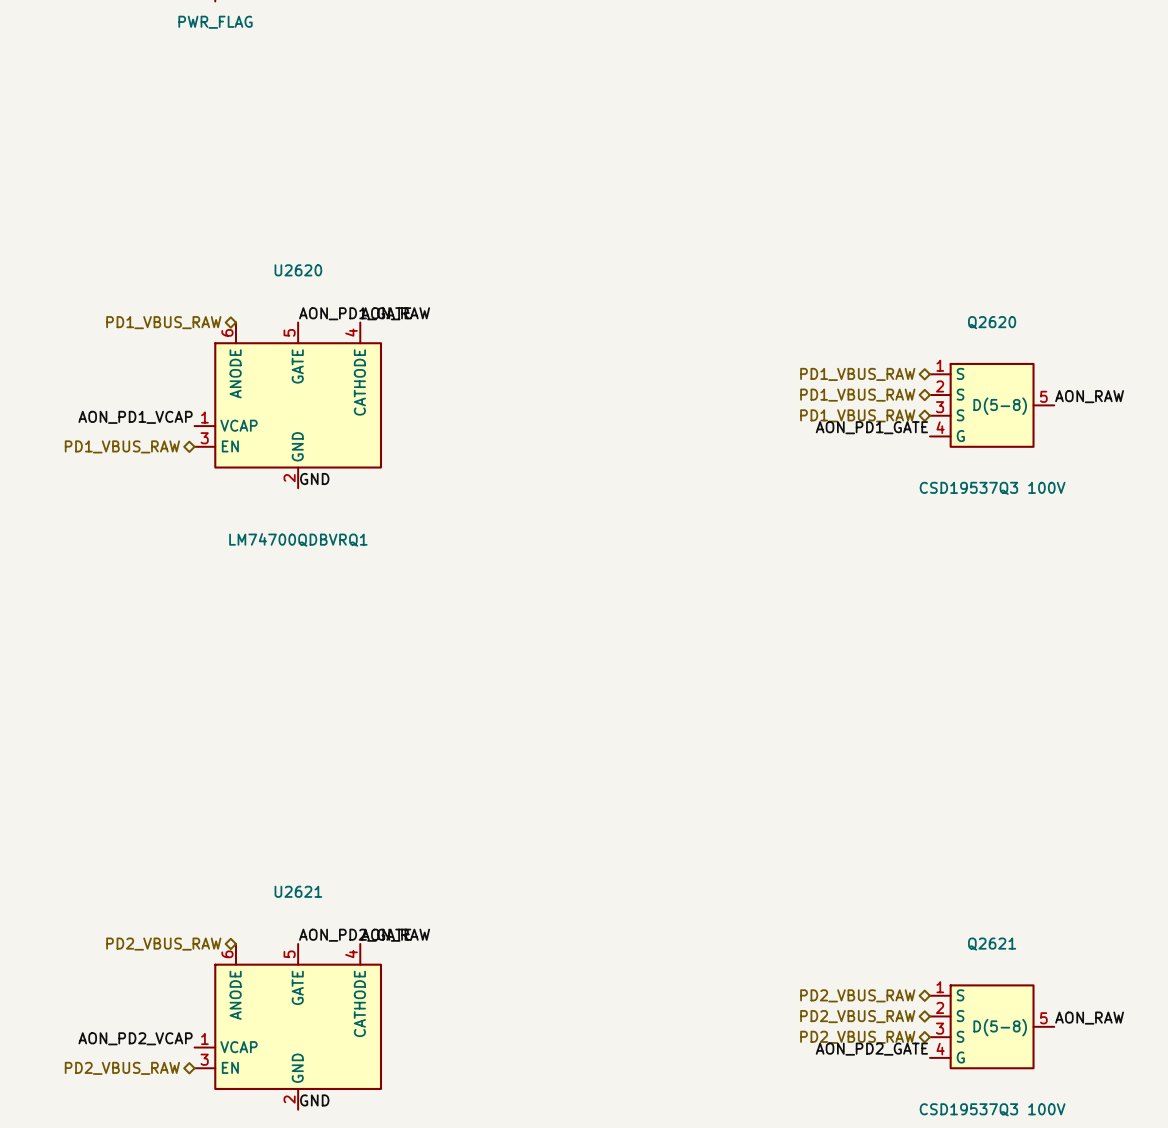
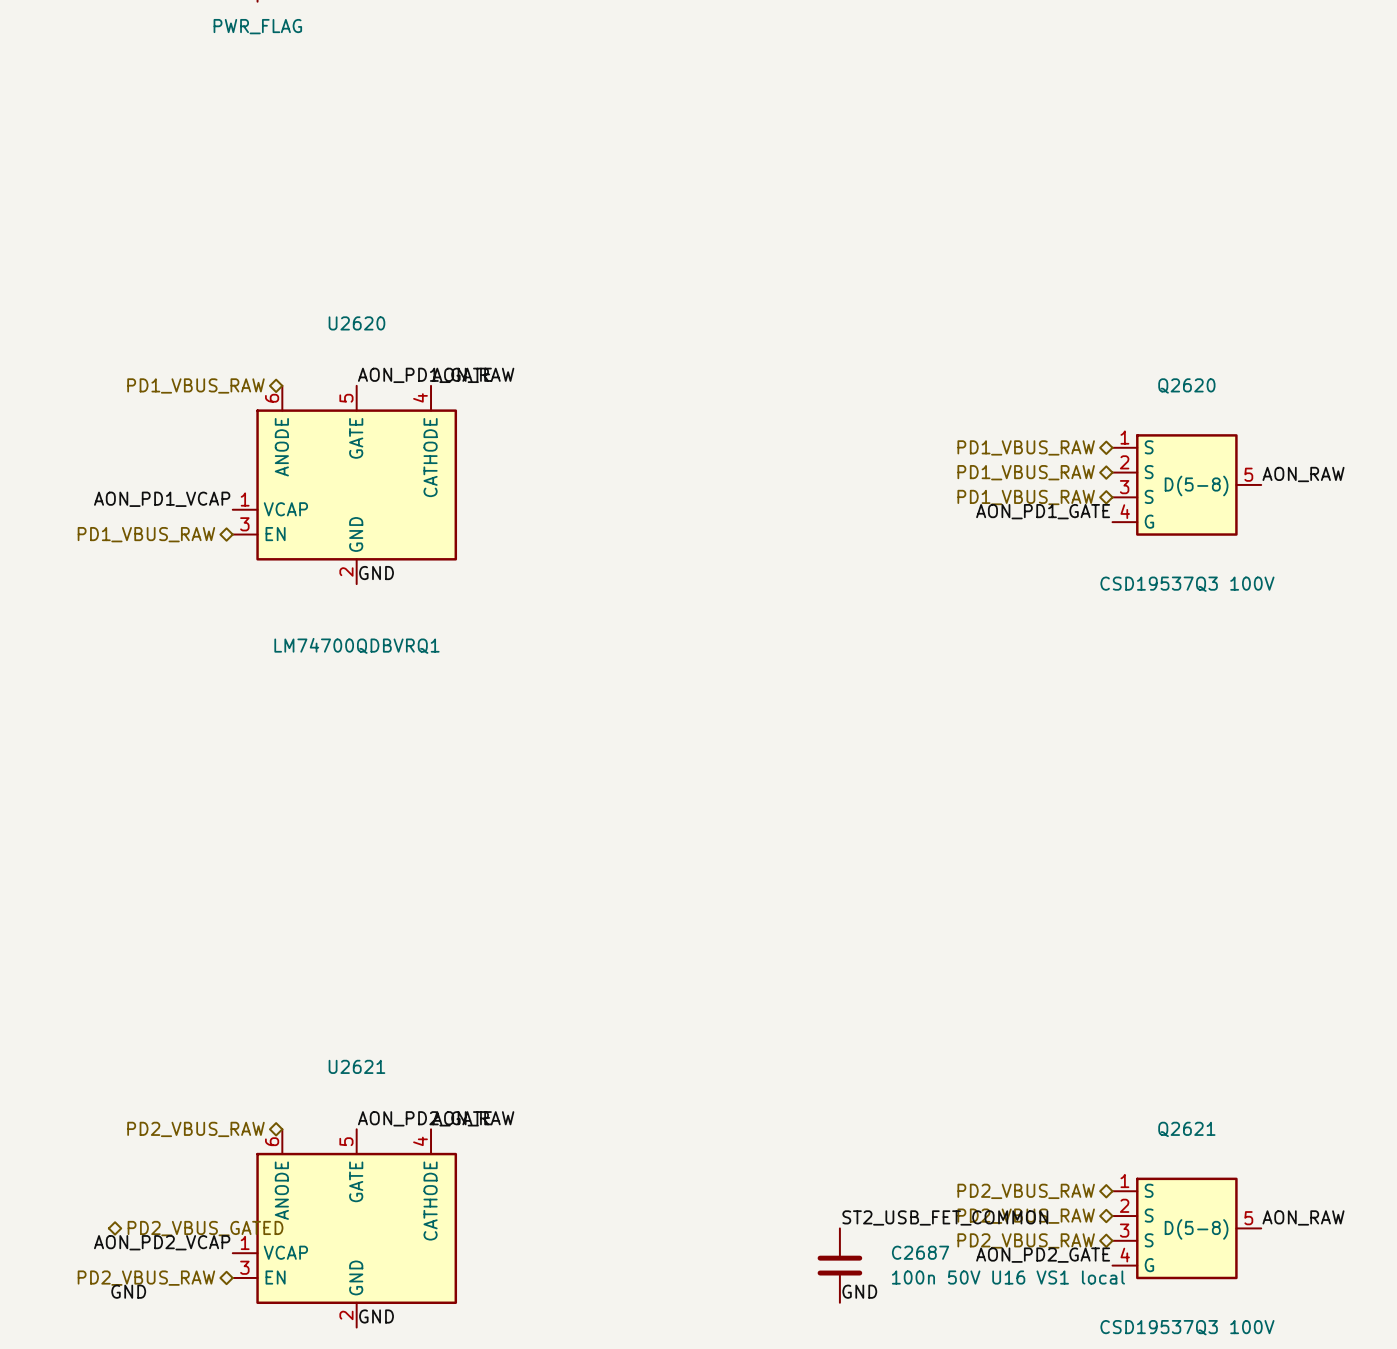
label: none -> ST2_USB_FET_COMMON (945, 1217)
hierarchical label: none -> PD2_VBUS_GATED (205, 1228)
C2687: none -> 100n 50V U16 VS1 local (839, 1265)
label: none -> GND (128, 1291)
label: none -> GND (859, 1291)

